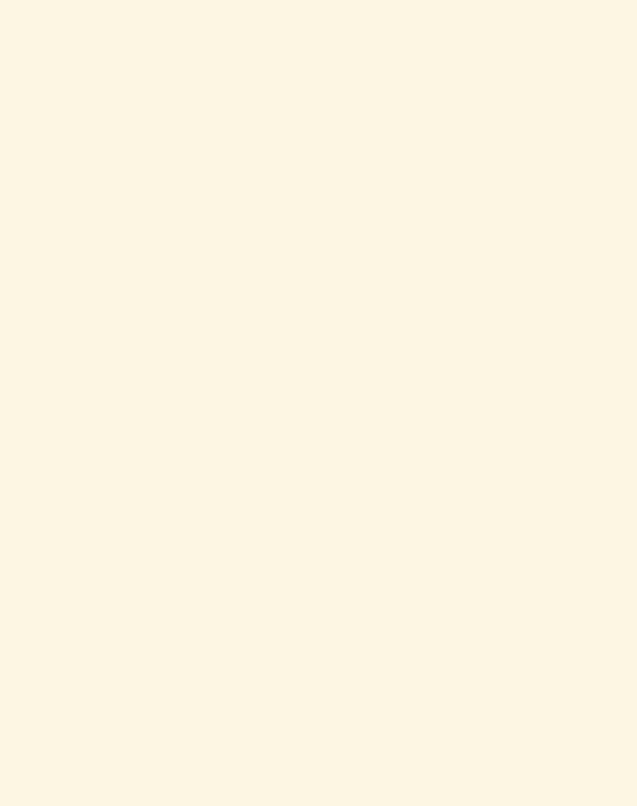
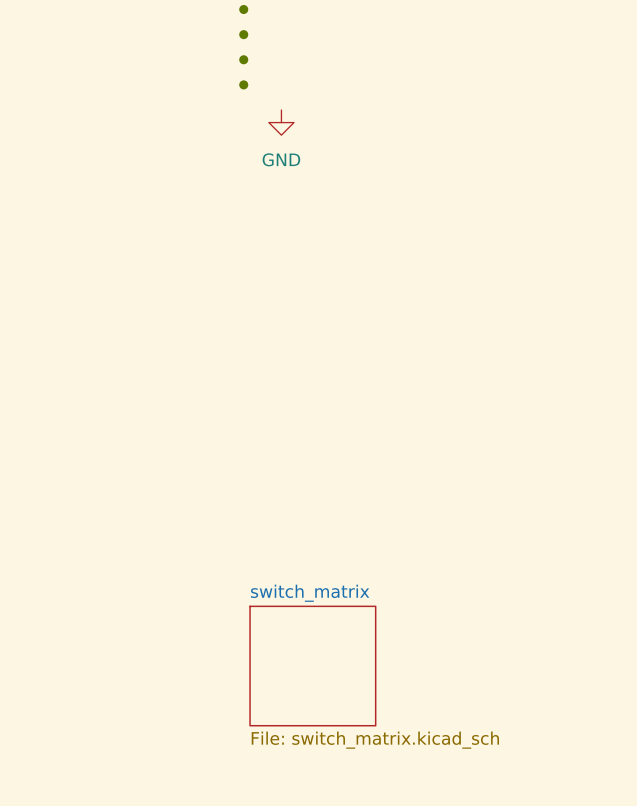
junction: none -> (243, 9)
junction: none -> (243, 34)
junction: none -> (243, 59)
junction: none -> (243, 84)
power symbol: none -> GND (281, 122)
sheet switch_matrix: none -> File: switch_matrix.kicad_sch (312, 666)

